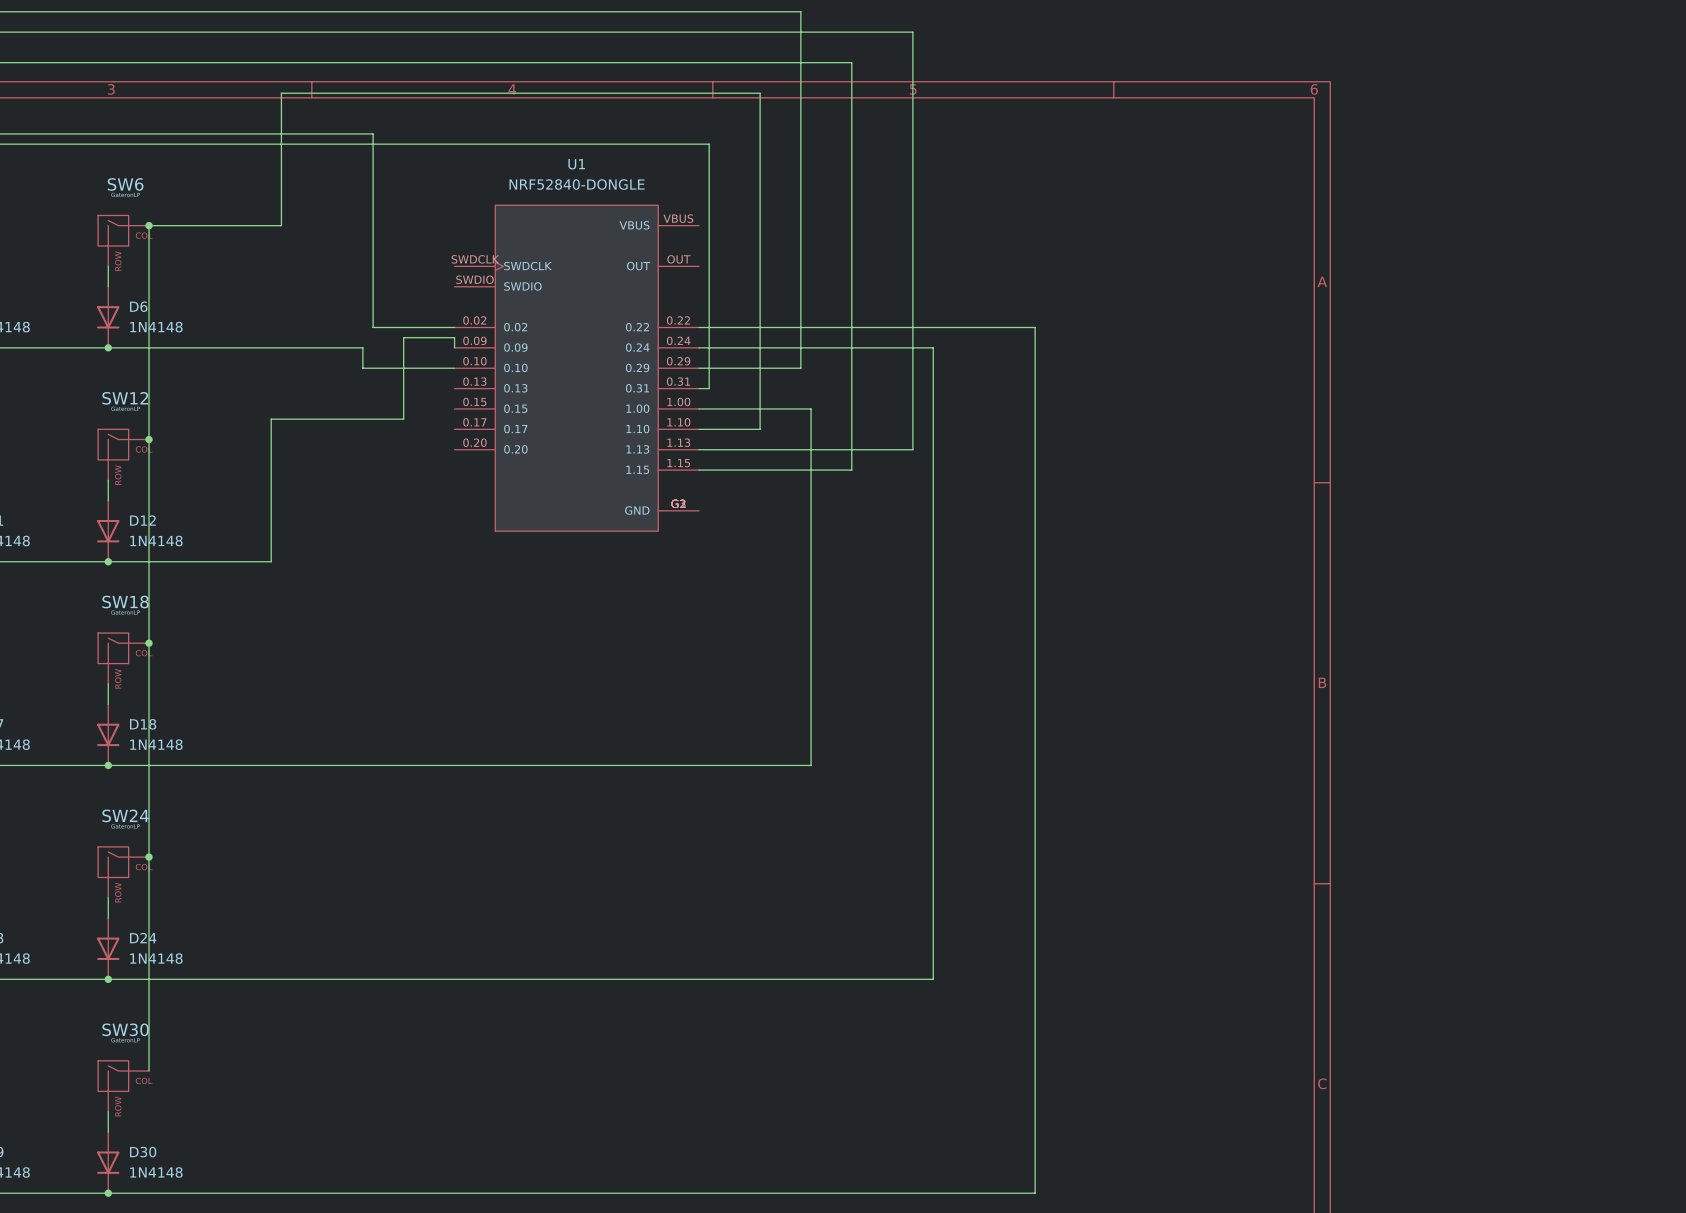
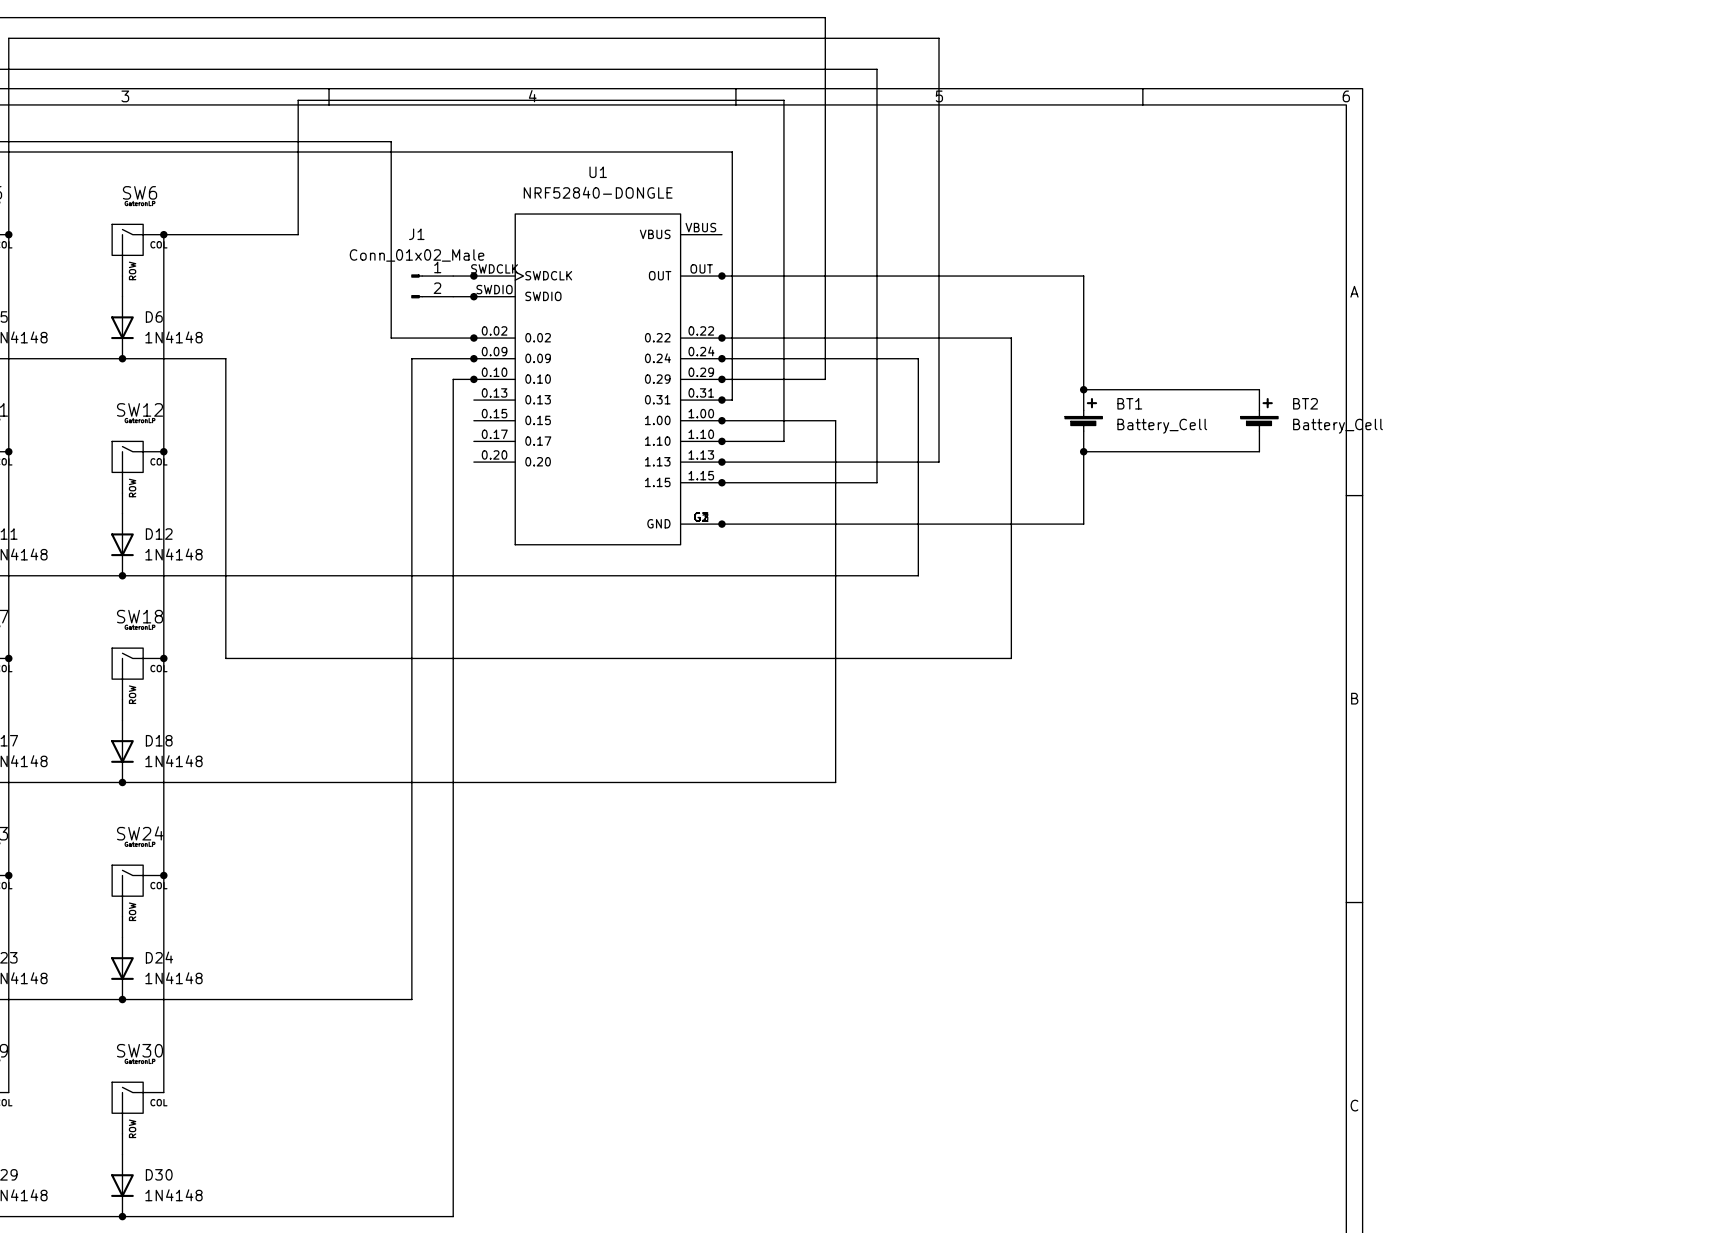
wire: none -> (453, 276) (473, 276)
junction: none -> (473, 276)
wire: none -> (721, 276) (1083, 276) (1083, 389) (1259, 389)
junction: none -> (721, 276)
J1: none -> Conn_01x02_Male (432, 286)
wire: none -> (453, 296) (473, 296)
junction: none -> (473, 296)
junction: none -> (473, 338)
junction: none -> (721, 338)
wire: (984, 327) (1035, 327) (1035, 1193) (434, 1193) -> (453, 379) (453, 1216)
wire: (210, 347) (362, 347) (362, 368) (434, 368) -> (225, 358) (225, 658) (1011, 658) (1011, 338)
wire: (454, 347) (454, 337) (403, 337) (403, 419) (271, 419) (271, 561) -> (473, 358) (411, 358) (411, 999)
junction: none -> (473, 358)
junction: none -> (721, 358)
wire: (892, 347) (933, 347) (933, 979) (393, 979) -> (918, 358) (918, 575) (287, 575)
junction: none -> (473, 379)
junction: none -> (721, 379)
junction: none -> (1083, 389)
junction: none -> (721, 400)
junction: none -> (721, 420)
BT1: none -> Battery_Cell (1083, 420)
BT2: none -> Battery_Cell (1259, 420)
junction: none -> (721, 441)
junction: none -> (1083, 451)
wire: none -> (1259, 451) (1083, 451) (1083, 524) (721, 524)
junction: none -> (721, 462)
junction: none -> (721, 482)
junction: none -> (721, 524)

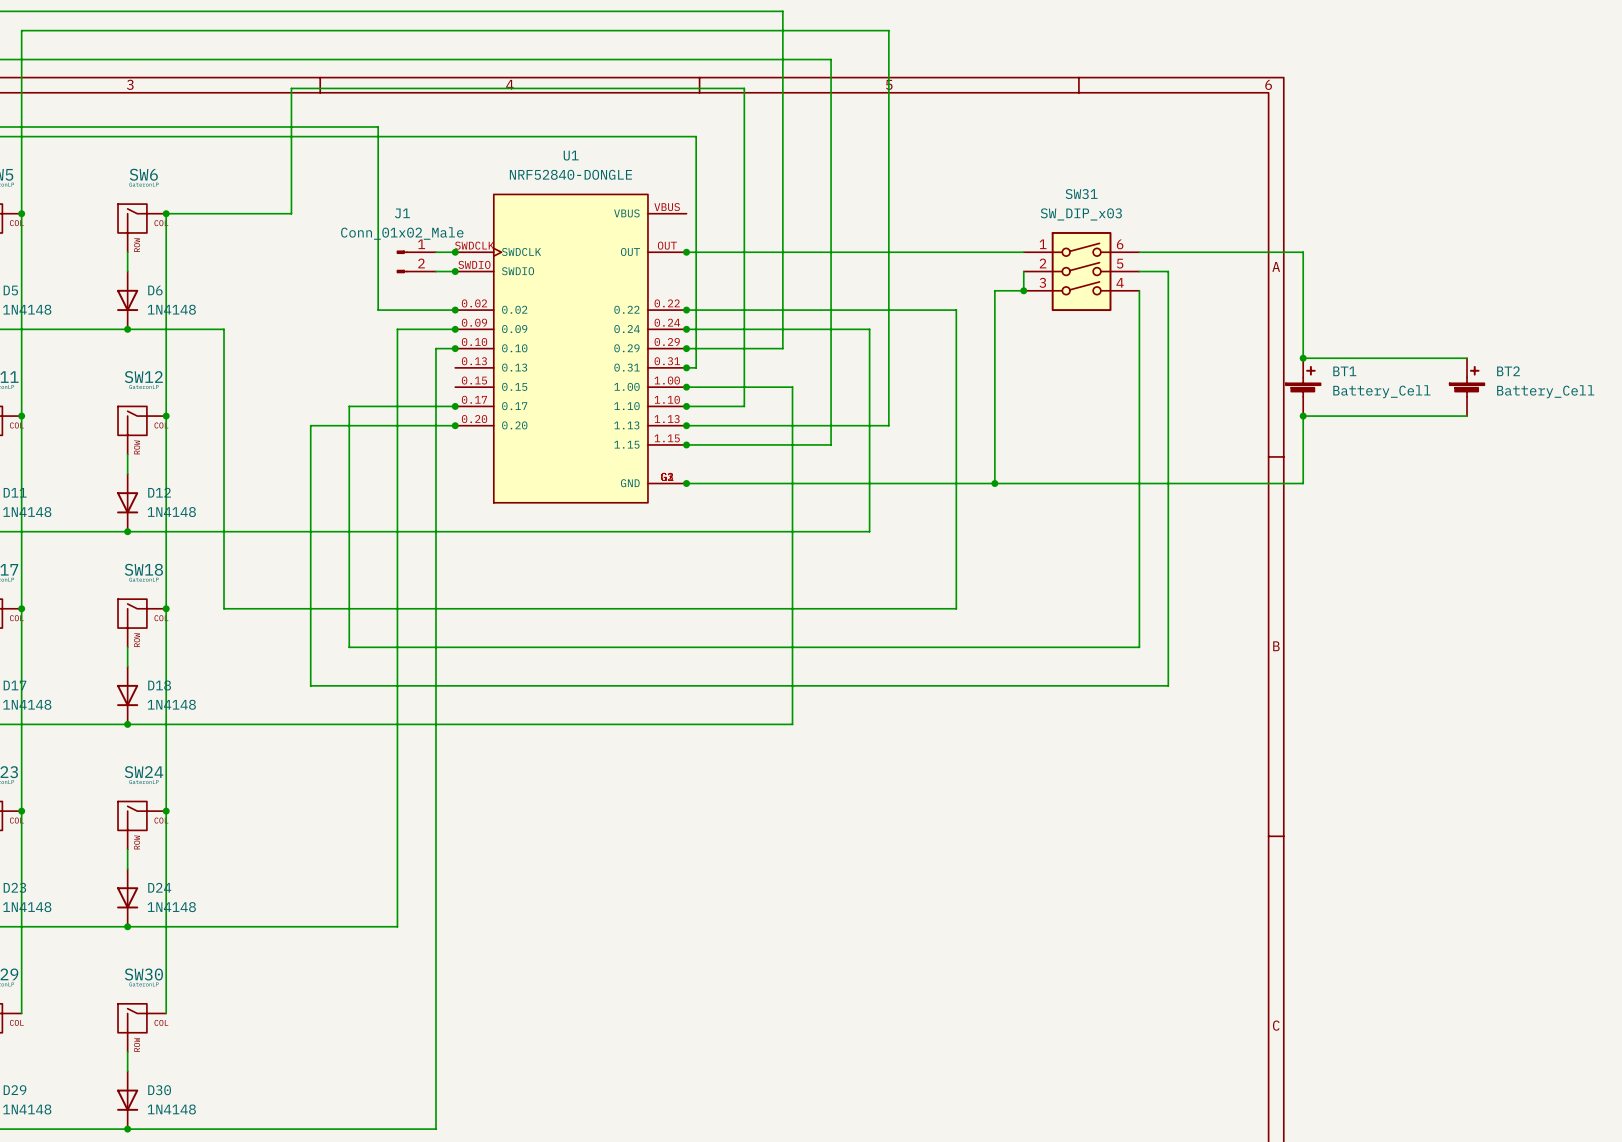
wire: (1083, 276) (1083, 296) -> none
wire: none -> (1139, 252) (1303, 252) (1303, 358) (1467, 358)
SW31: none -> SW_DIP_x03 (1081, 271)
wire: none -> (1139, 271) (1168, 271) (1168, 685) (310, 685) (310, 425) (455, 425)
wire: (1083, 317) (1083, 389) (1259, 389) -> (1023, 290) (994, 290) (994, 483)
junction: none -> (1023, 290)
wire: none -> (1139, 290) (1139, 647) (349, 647) (349, 406) (455, 406)
junction: (1083, 389) -> none
junction: none -> (1303, 358)
BT1 position: (1083, 420) -> (1303, 387)
BT2 position: (1259, 420) -> (1467, 387)
junction: none -> (455, 406)
junction: (1083, 451) -> none
wire: (1259, 451) (1083, 451) (1083, 524) -> (1467, 416) (1303, 416) (1303, 483) (1023, 483)
junction: none -> (1303, 416)
junction: none -> (455, 425)
junction: none -> (994, 483)

